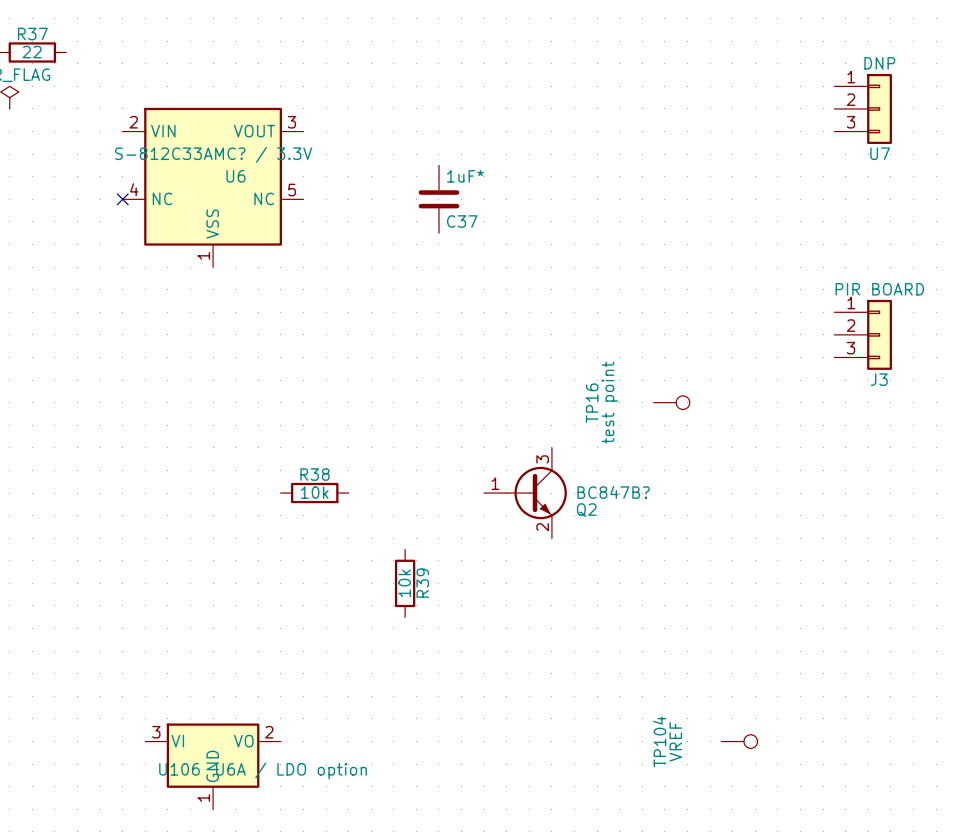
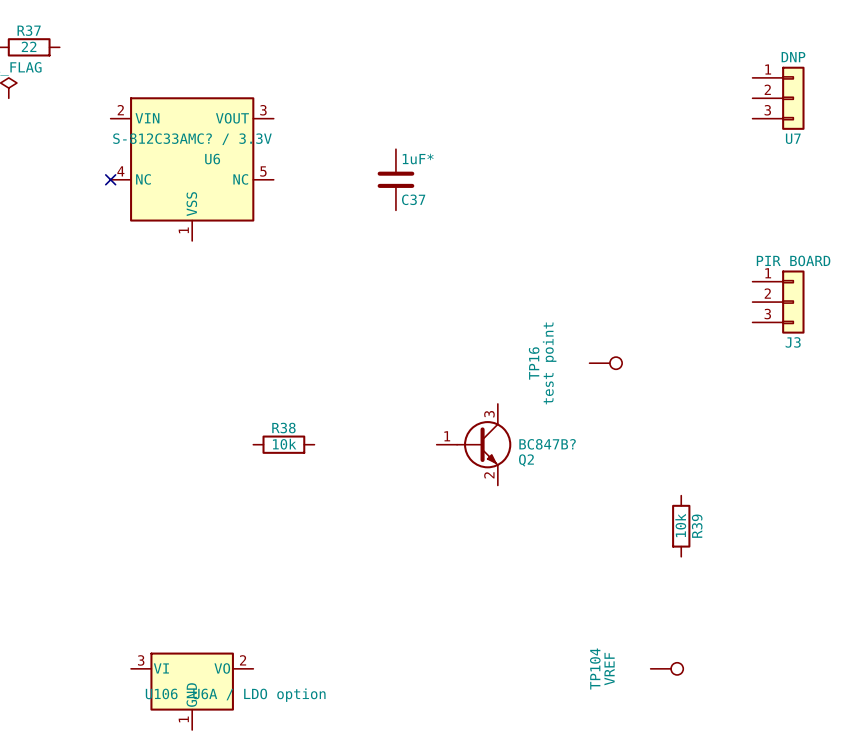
R39 position: (405, 583) -> (681, 526)

